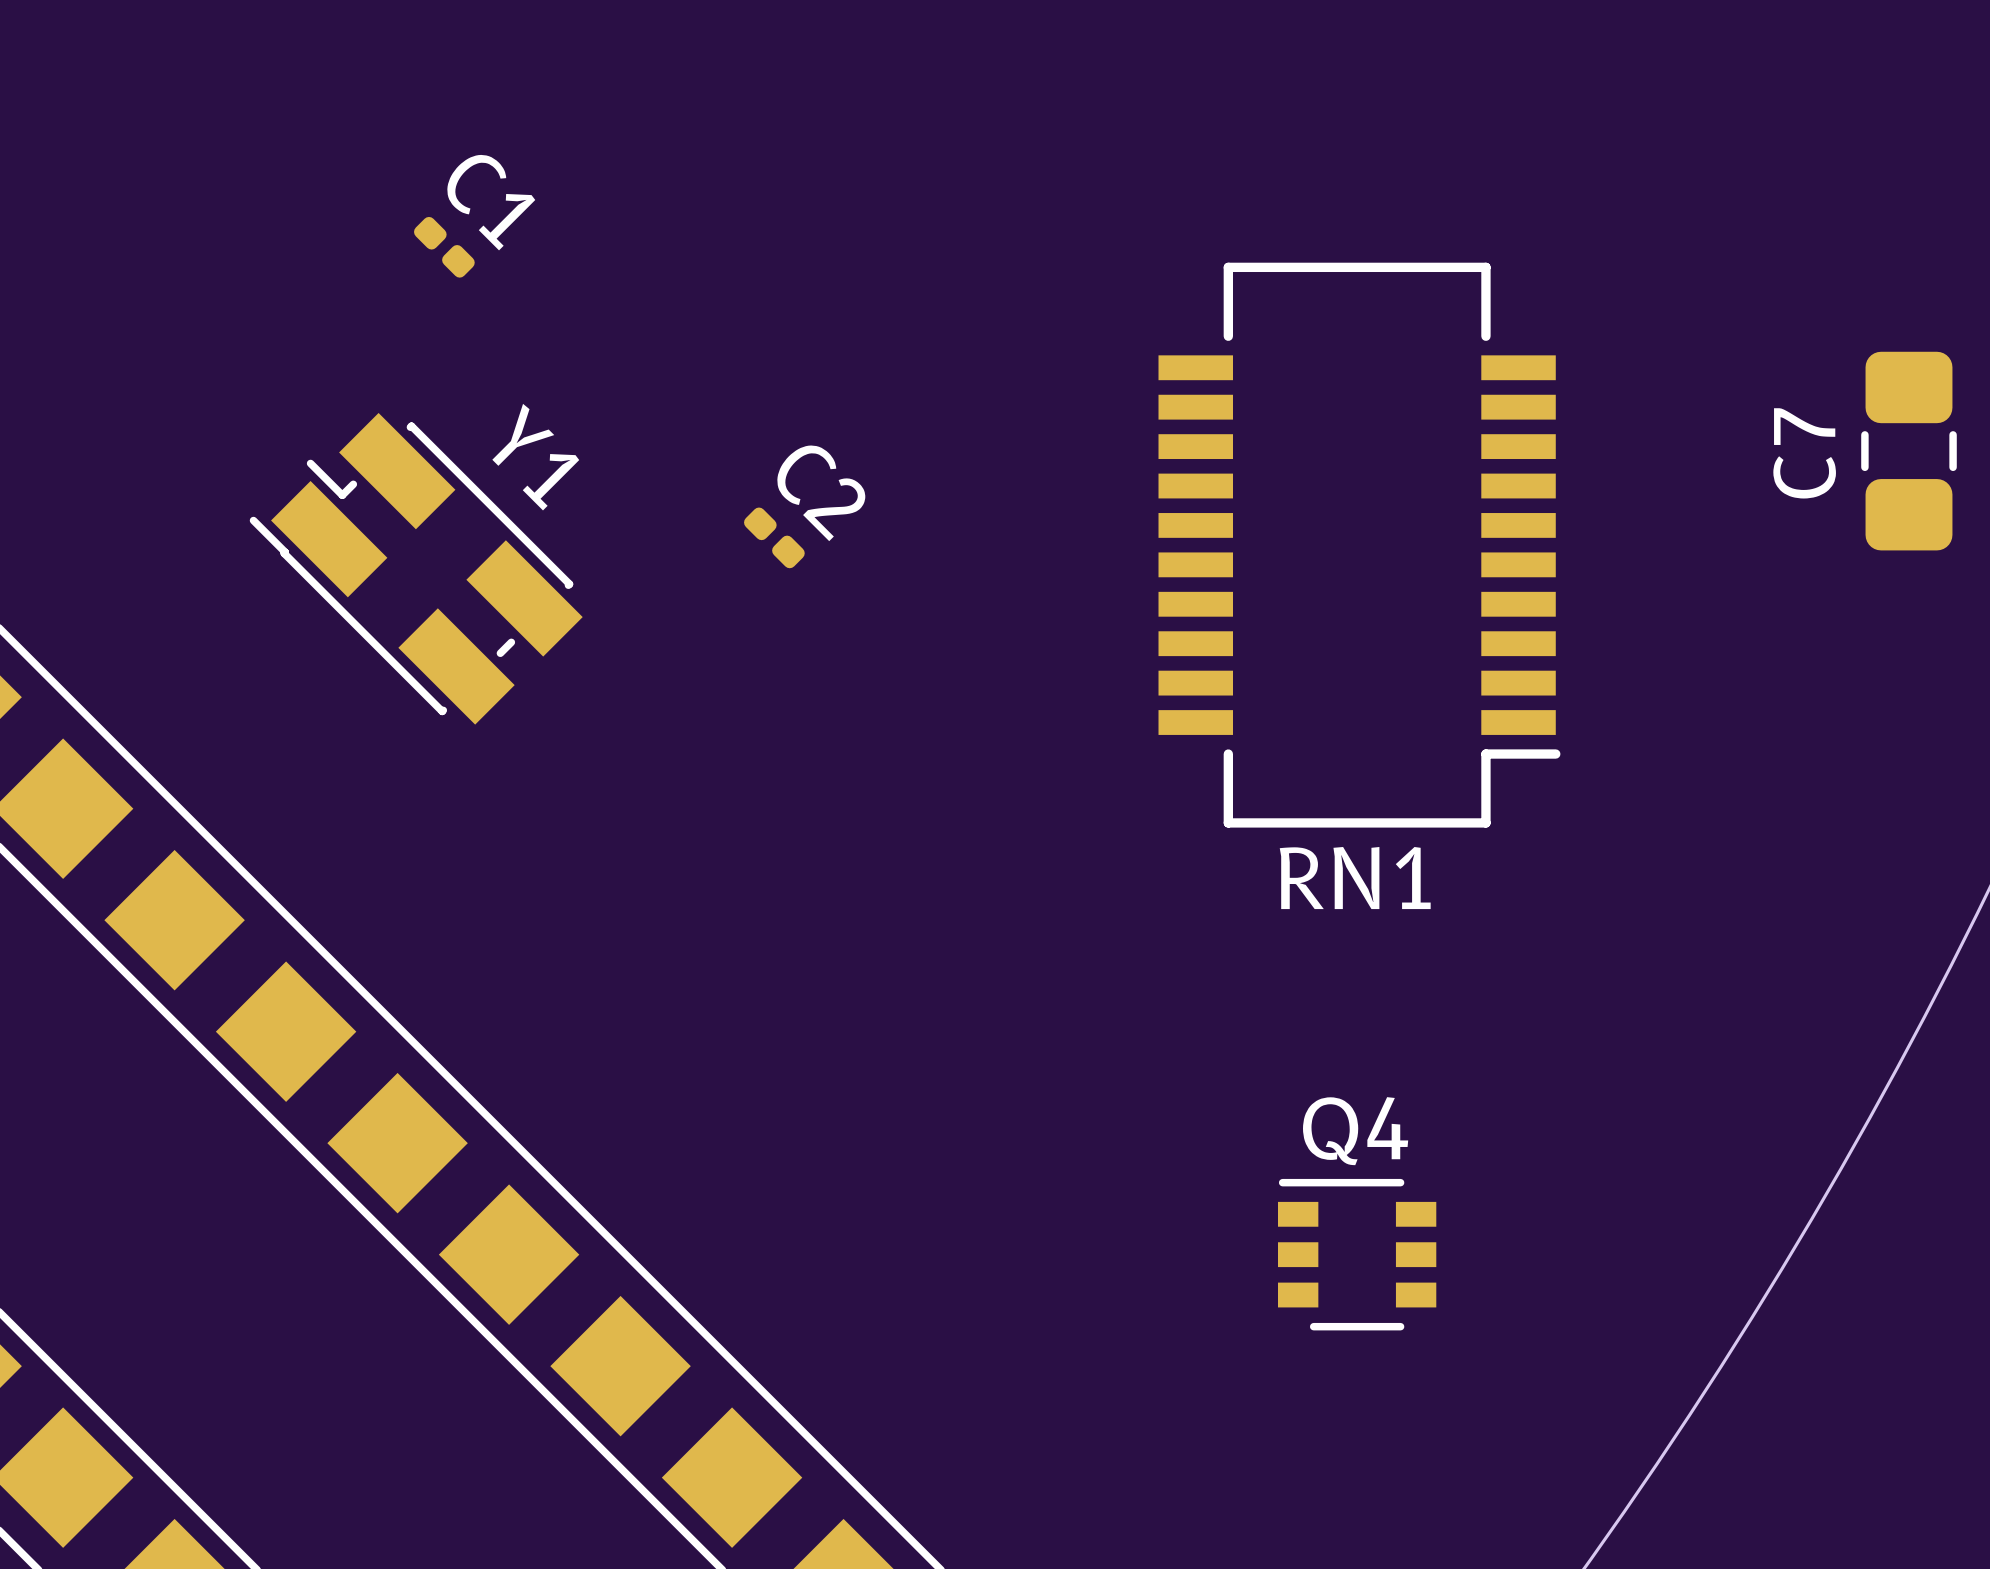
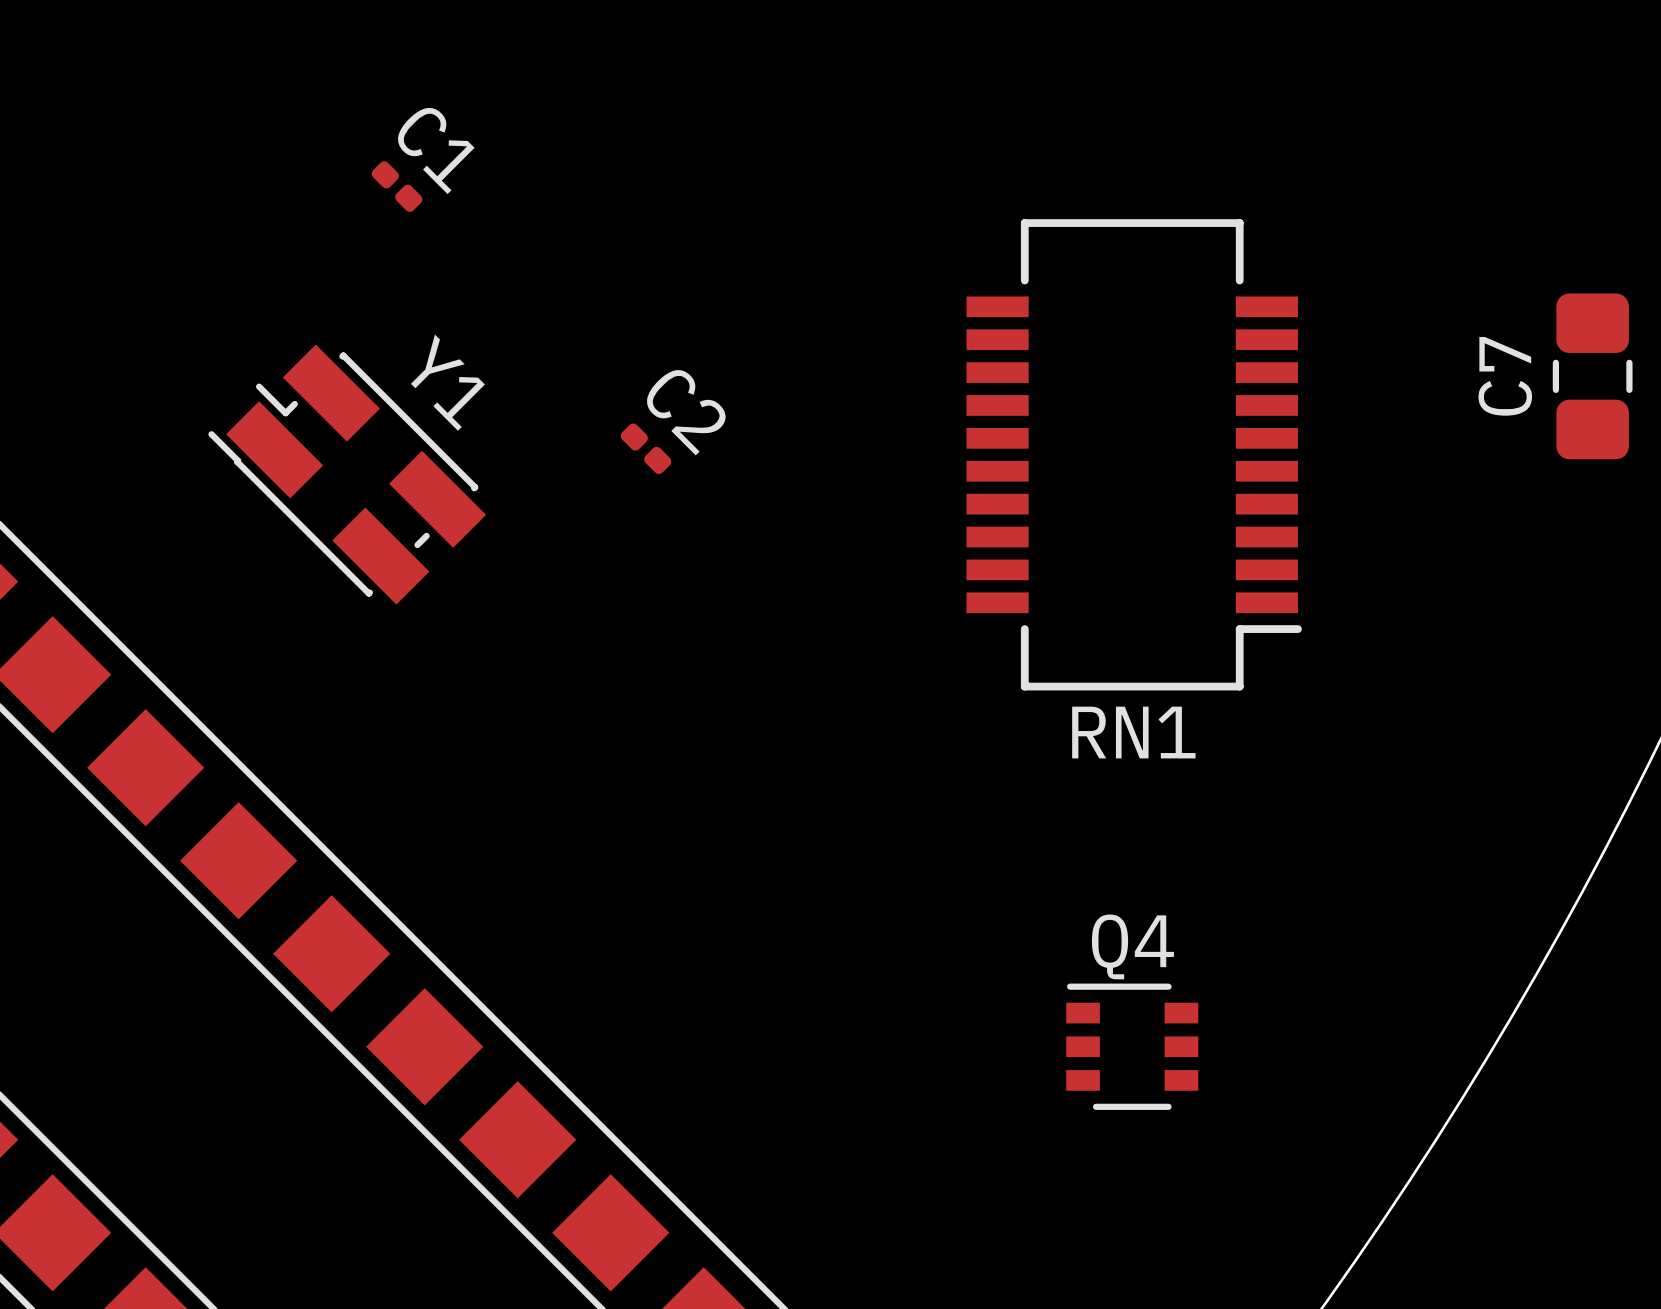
C1 position: (444, 247) -> (397, 186)

